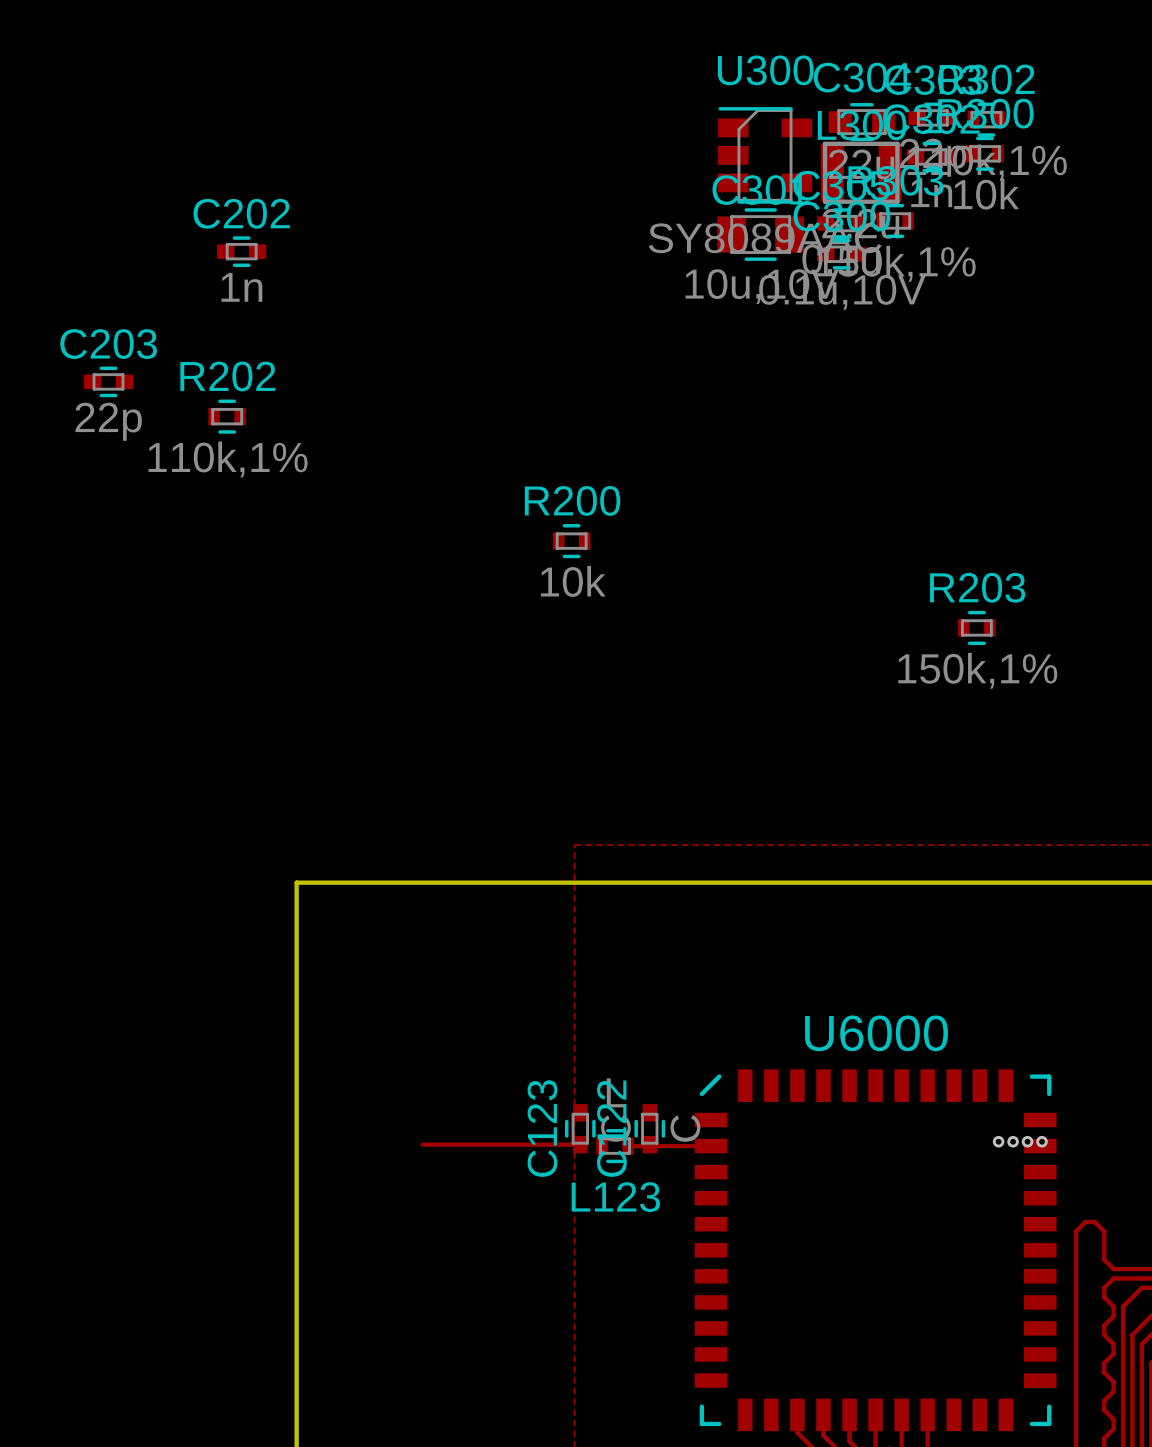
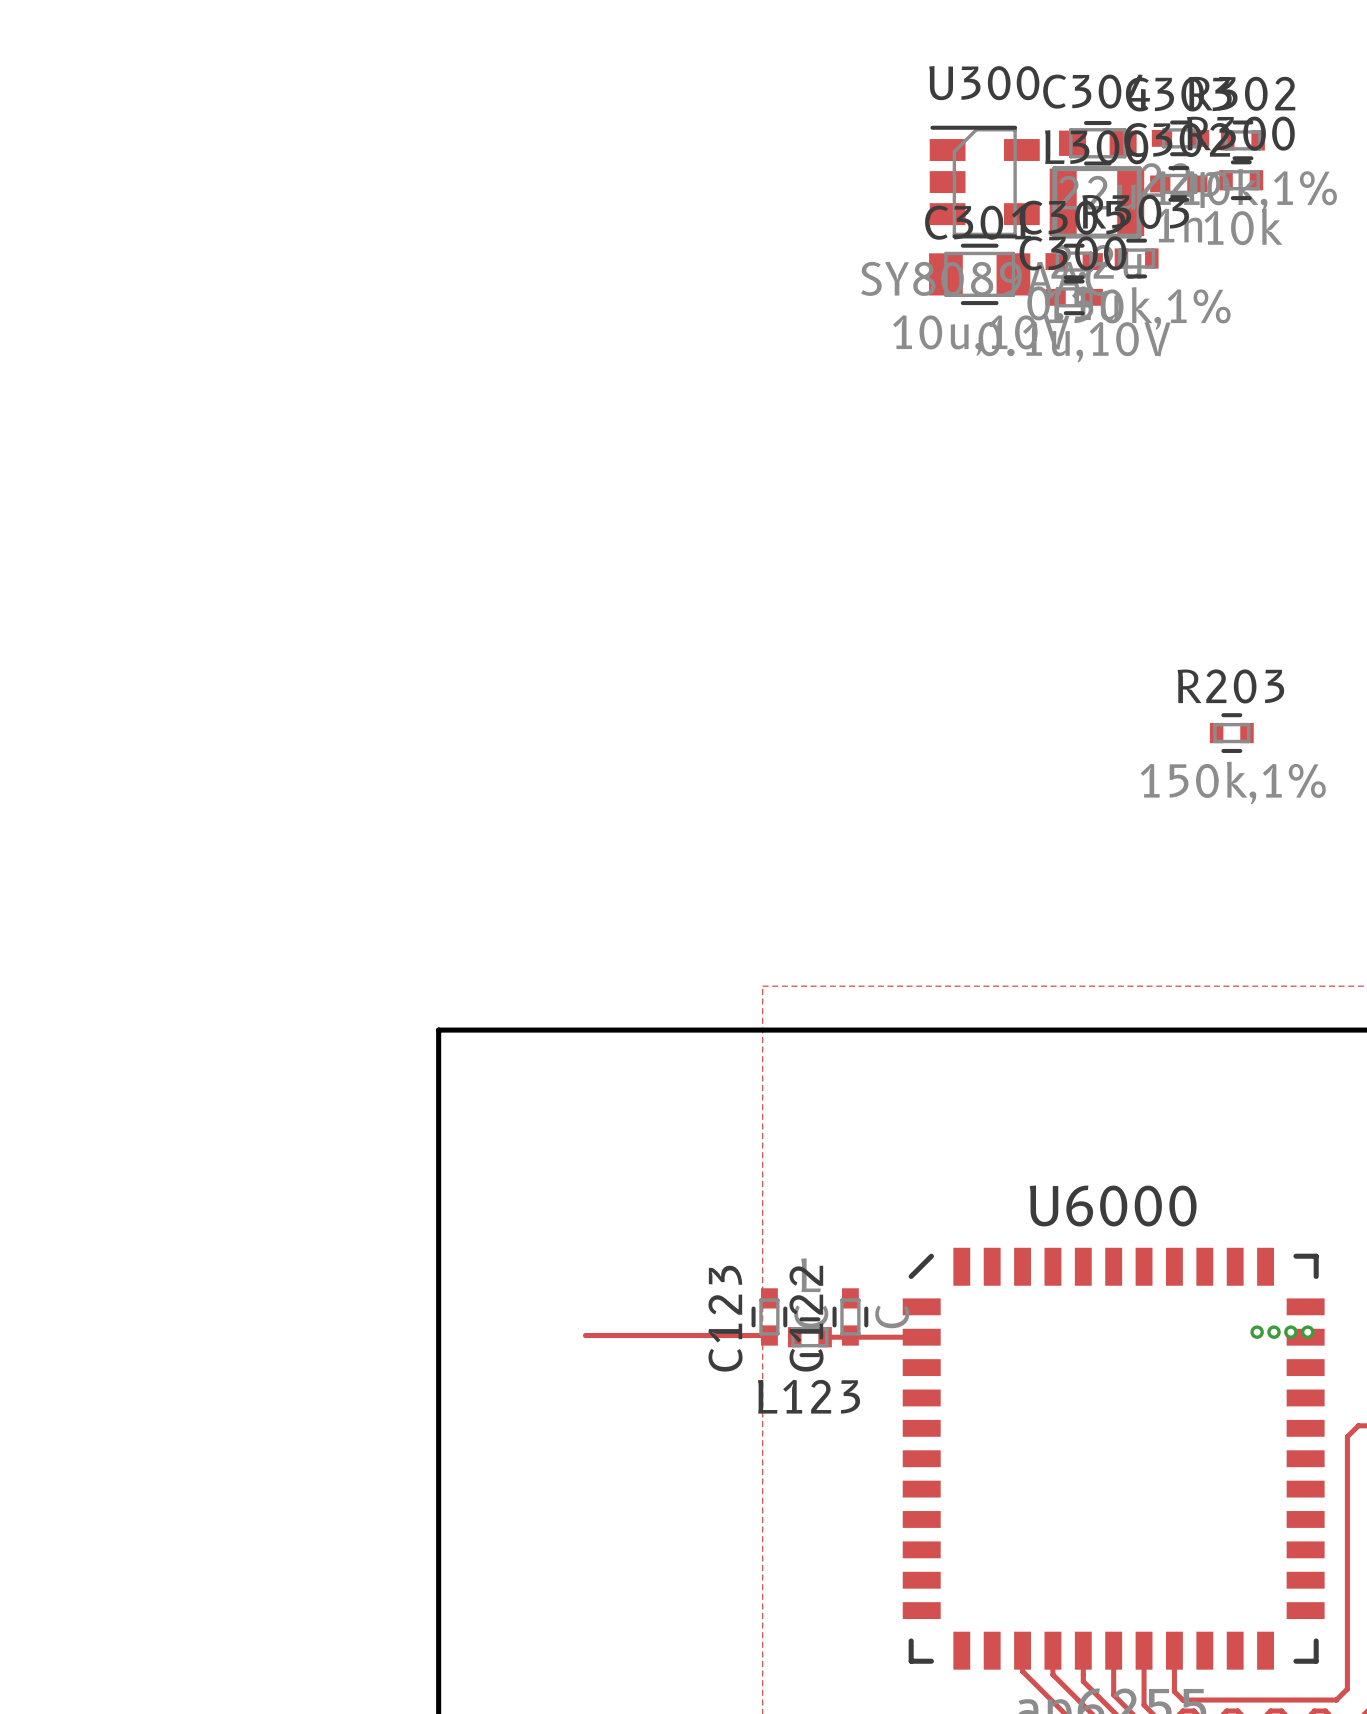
C202: 1n (241, 251) -> none
C203: 22p (108, 381) -> none
R202: 110k,1% (227, 416) -> none
R200: 10k (571, 541) -> none

